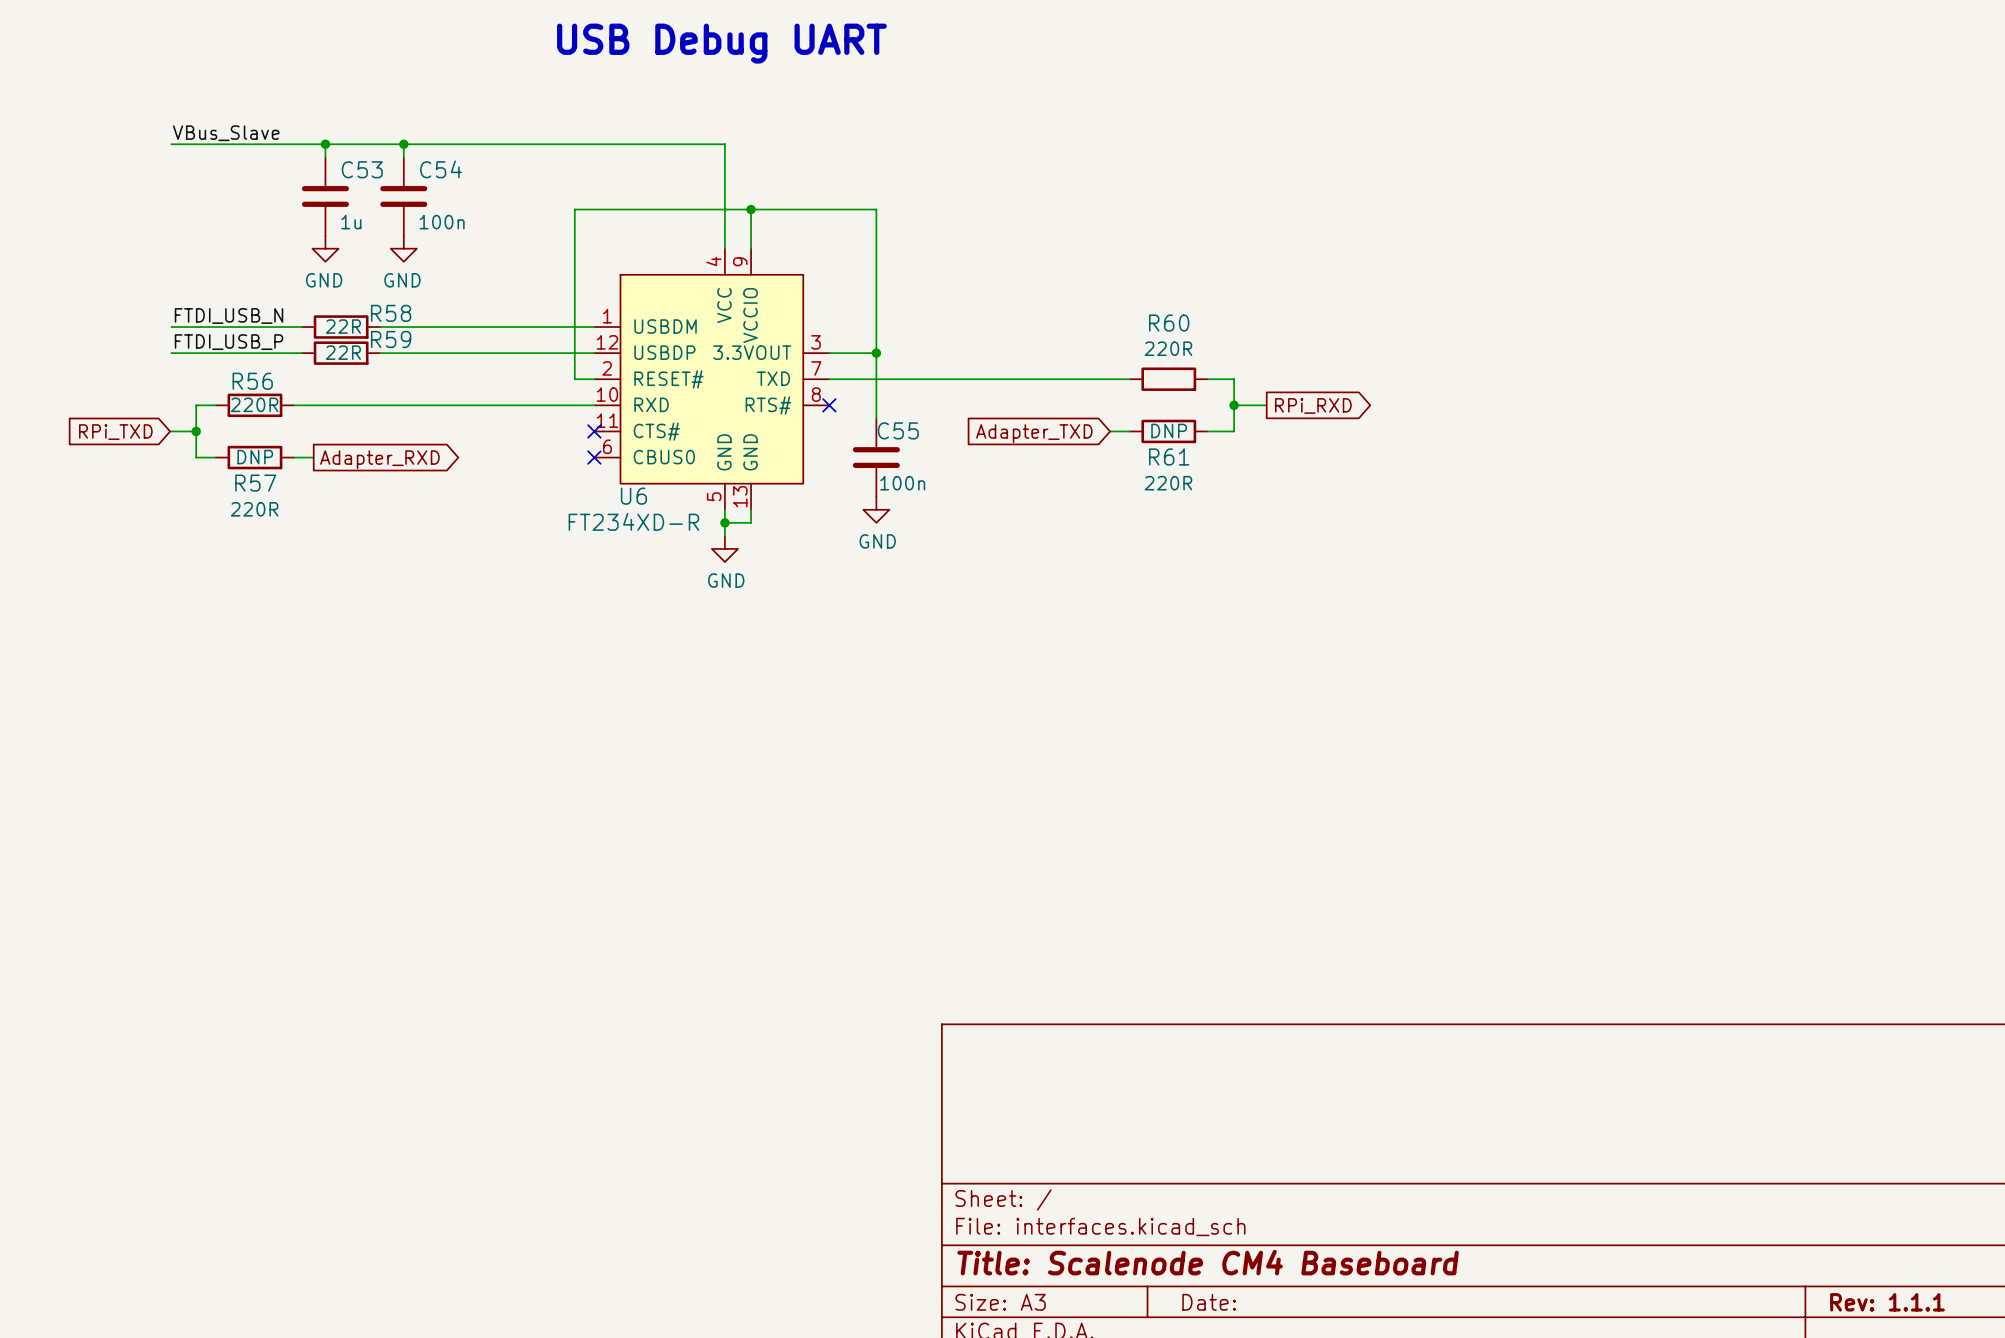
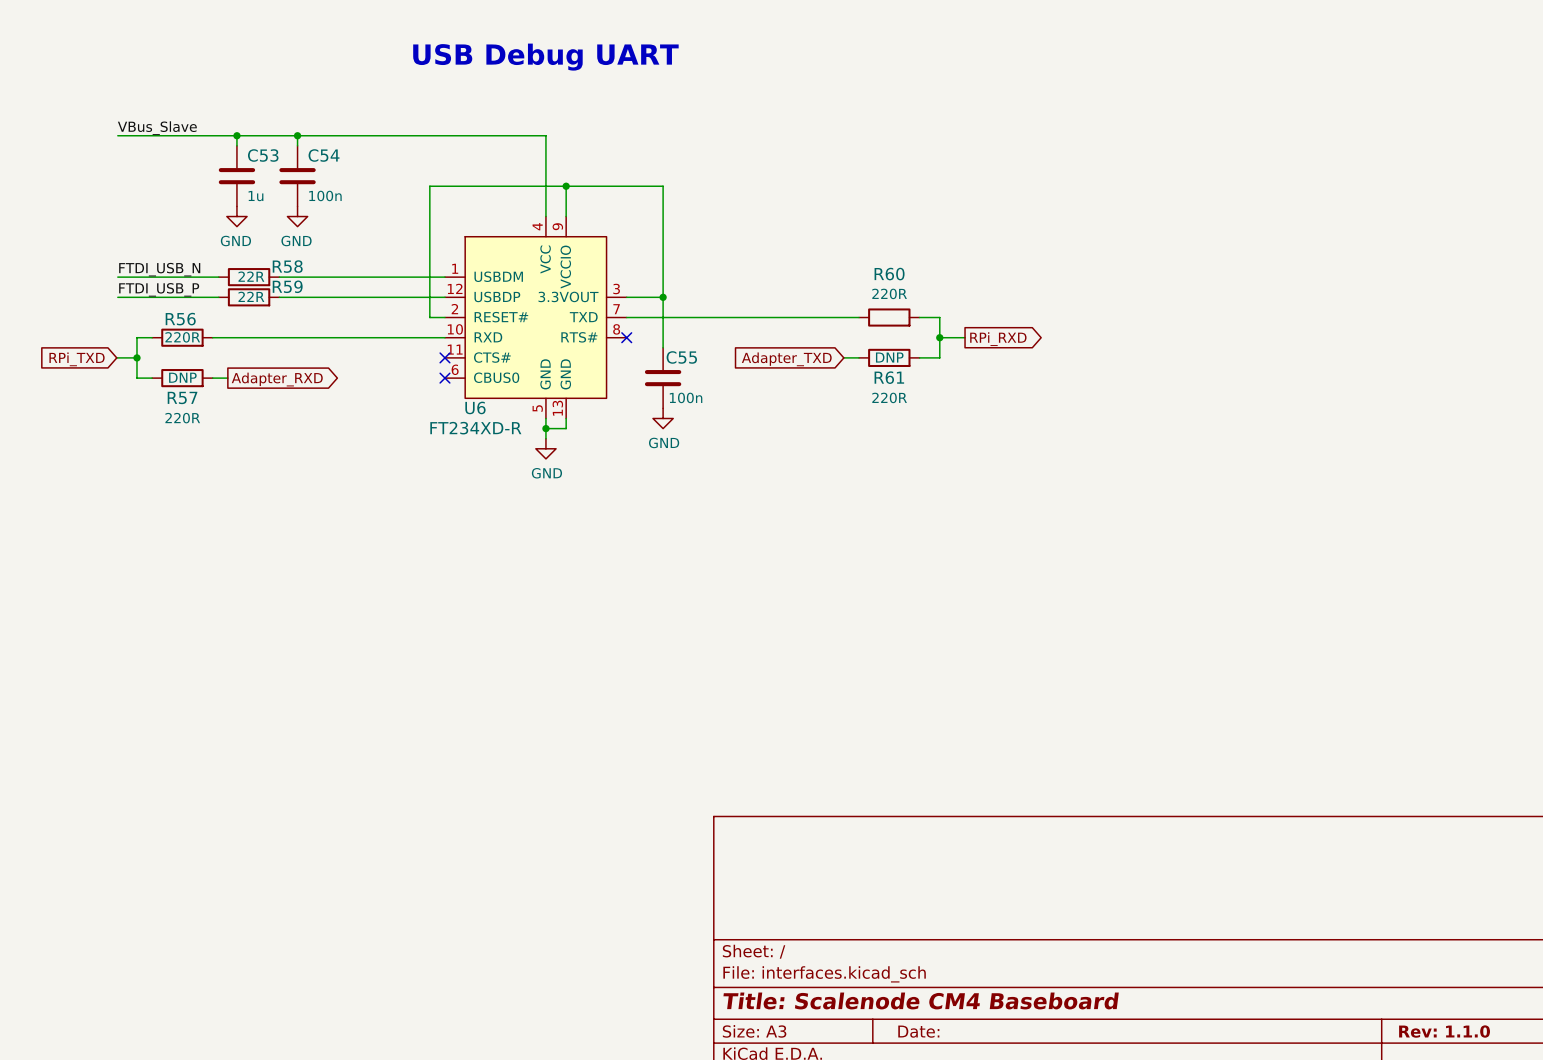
title block: Rev: 1.1.1 (1887, 1302) -> Rev: 1.1.0 (1444, 1031)

